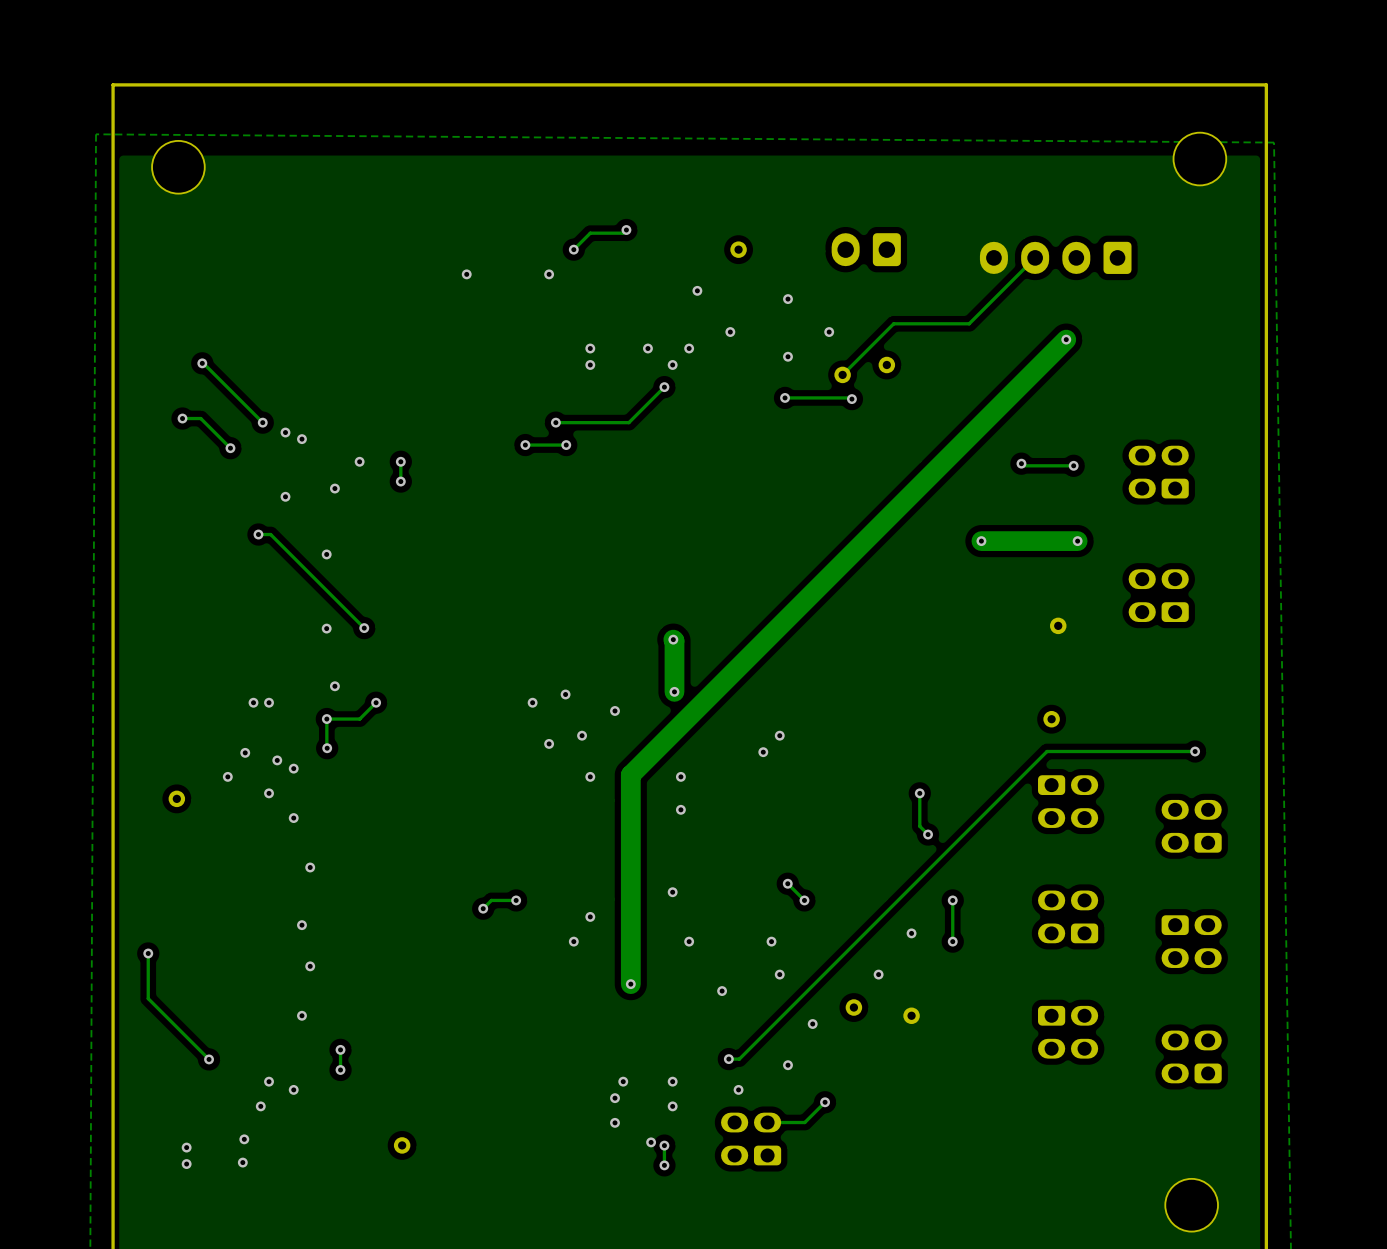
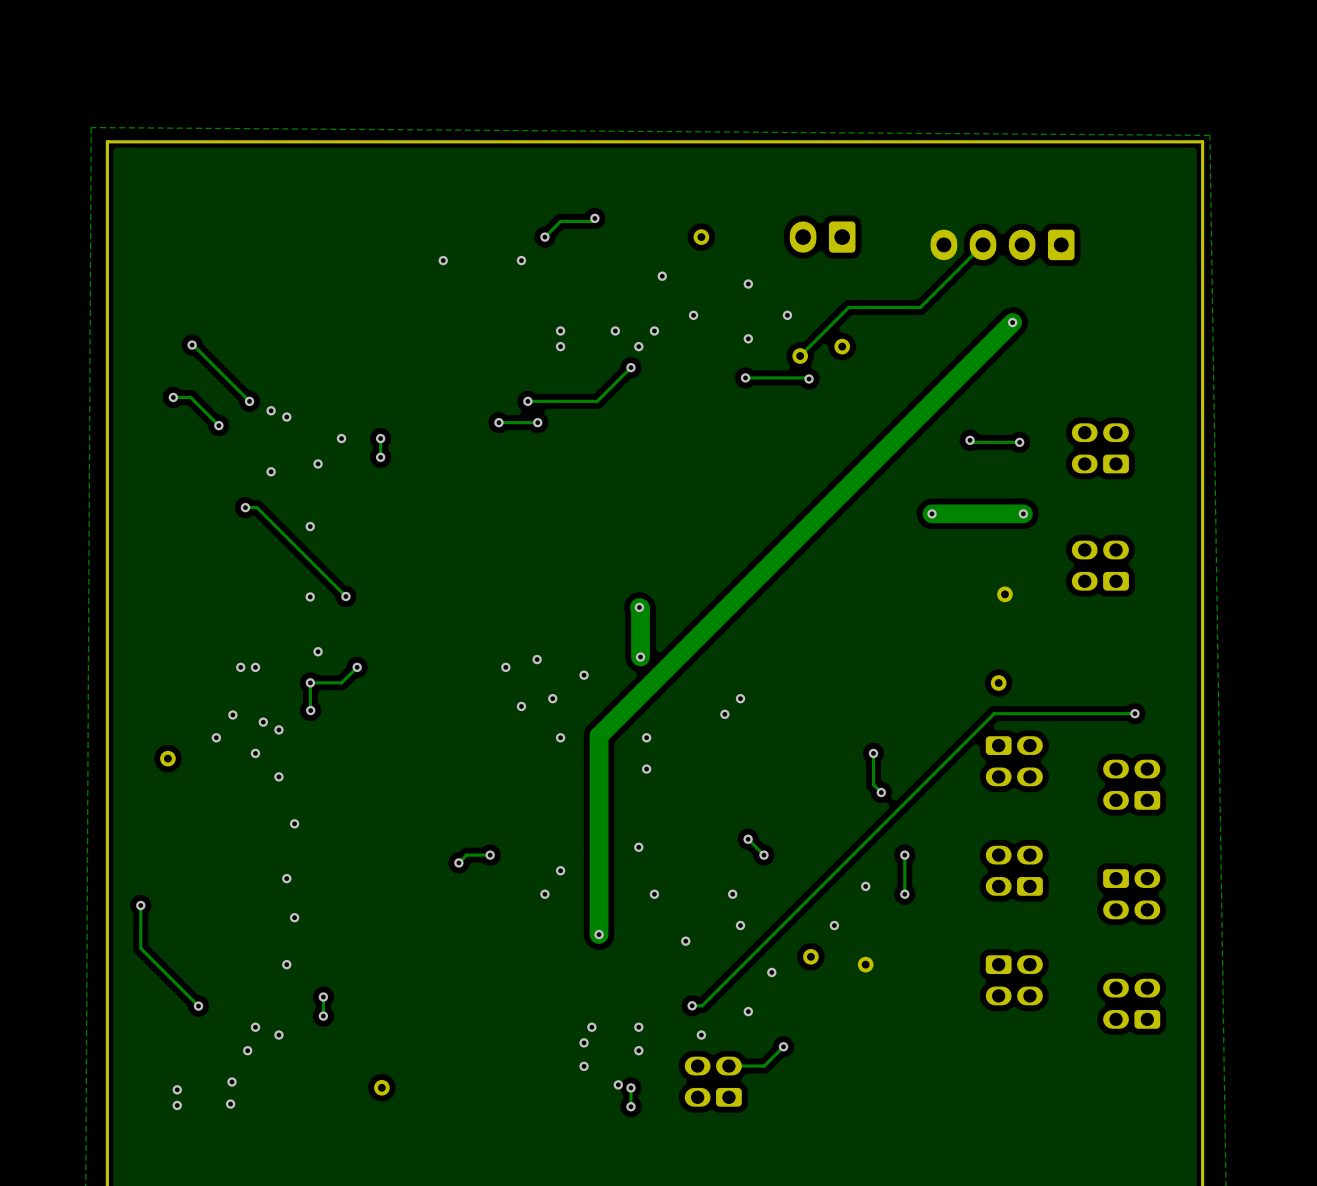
board edge: (1266, 149) (1266, 84) (113, 84) (113, 149) -> (1202, 141) (107, 141)
part: (1199, 159) -> none
part: (178, 167) -> none
part: (1191, 1205) -> none

